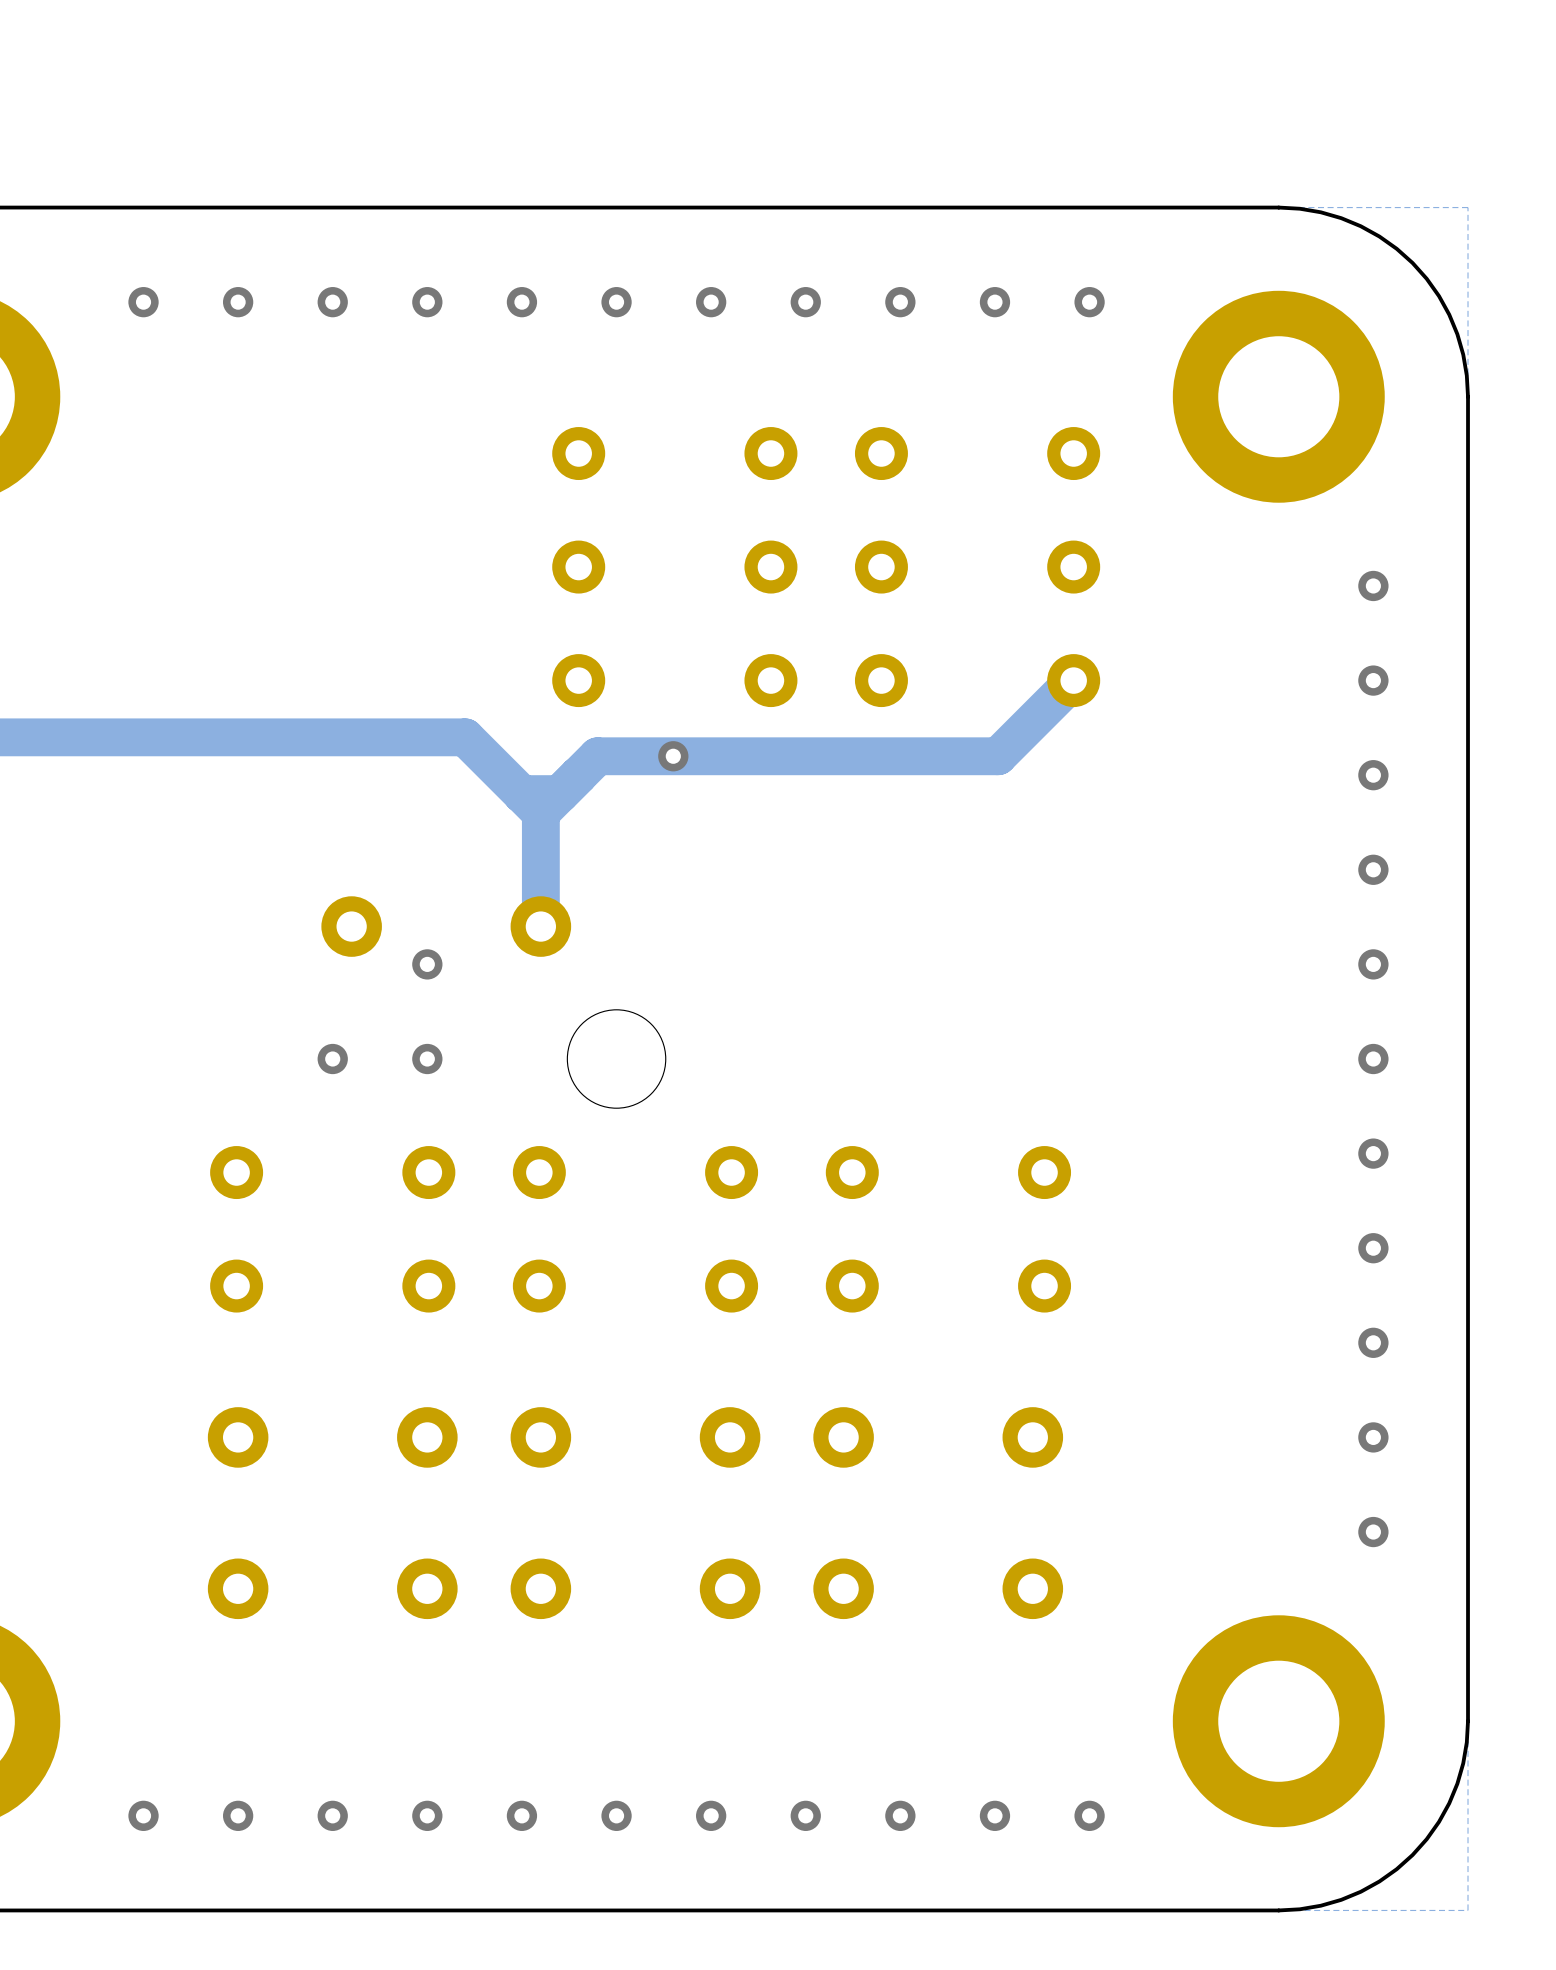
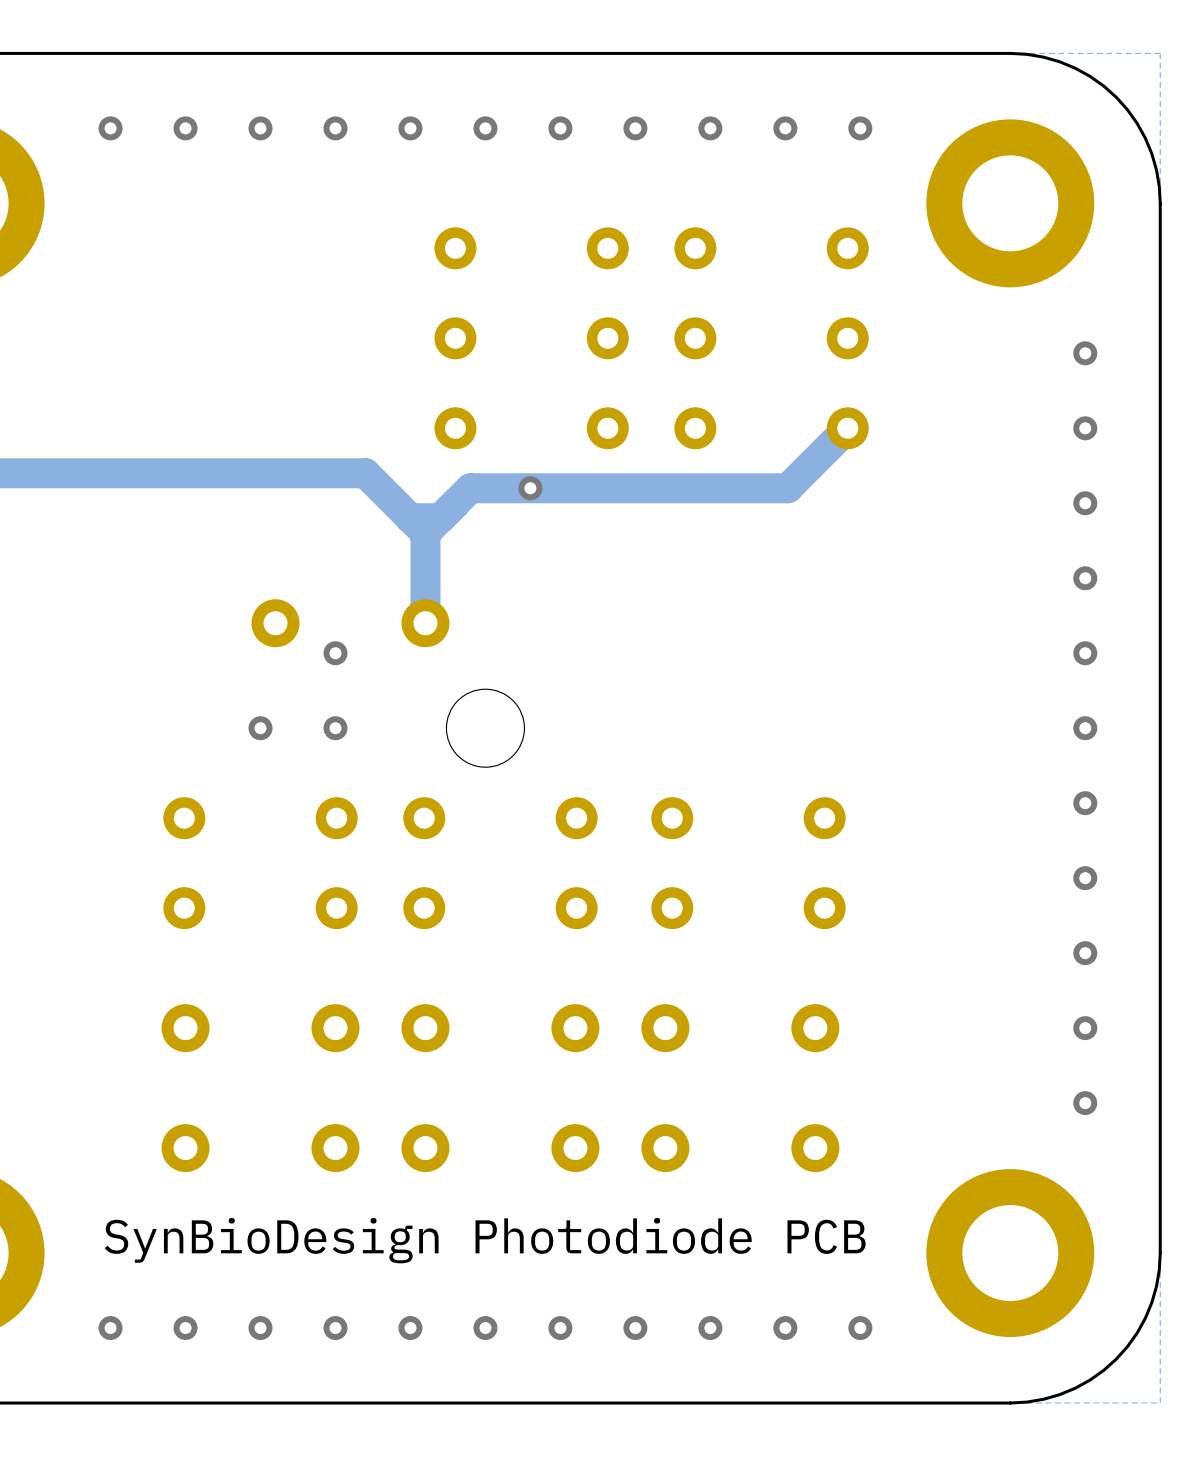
text: none -> SynBioDesign Photodiode PCB (485, 1240)

